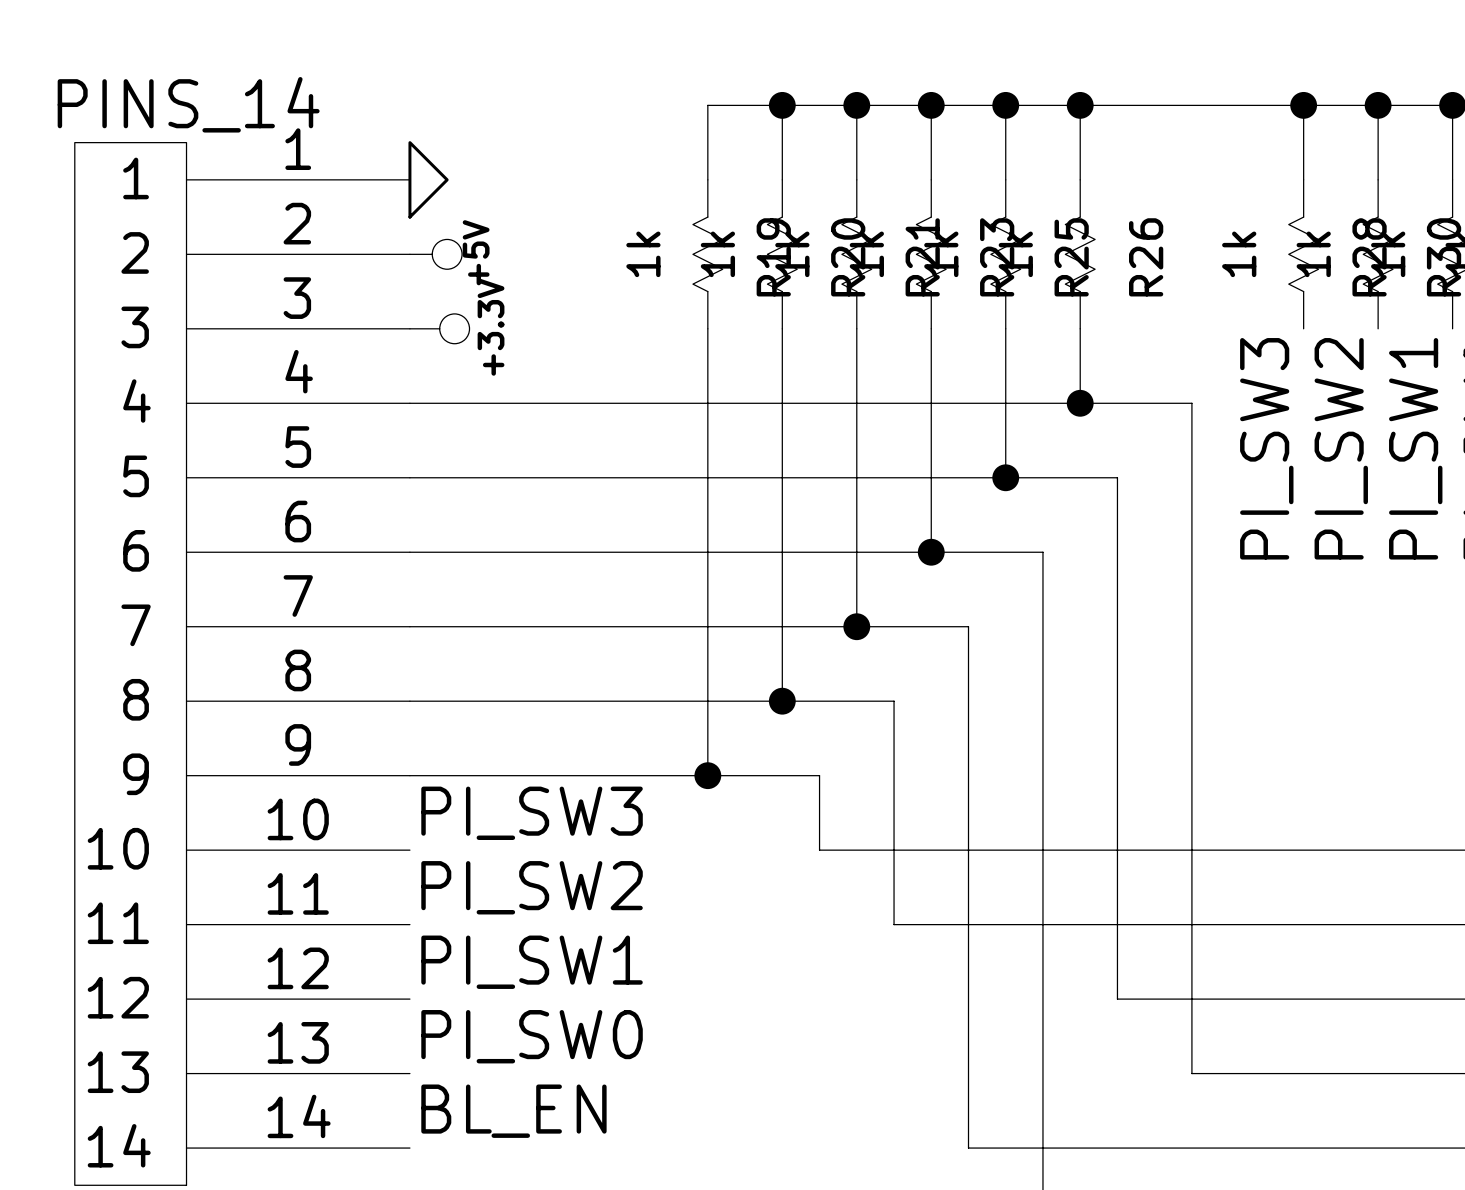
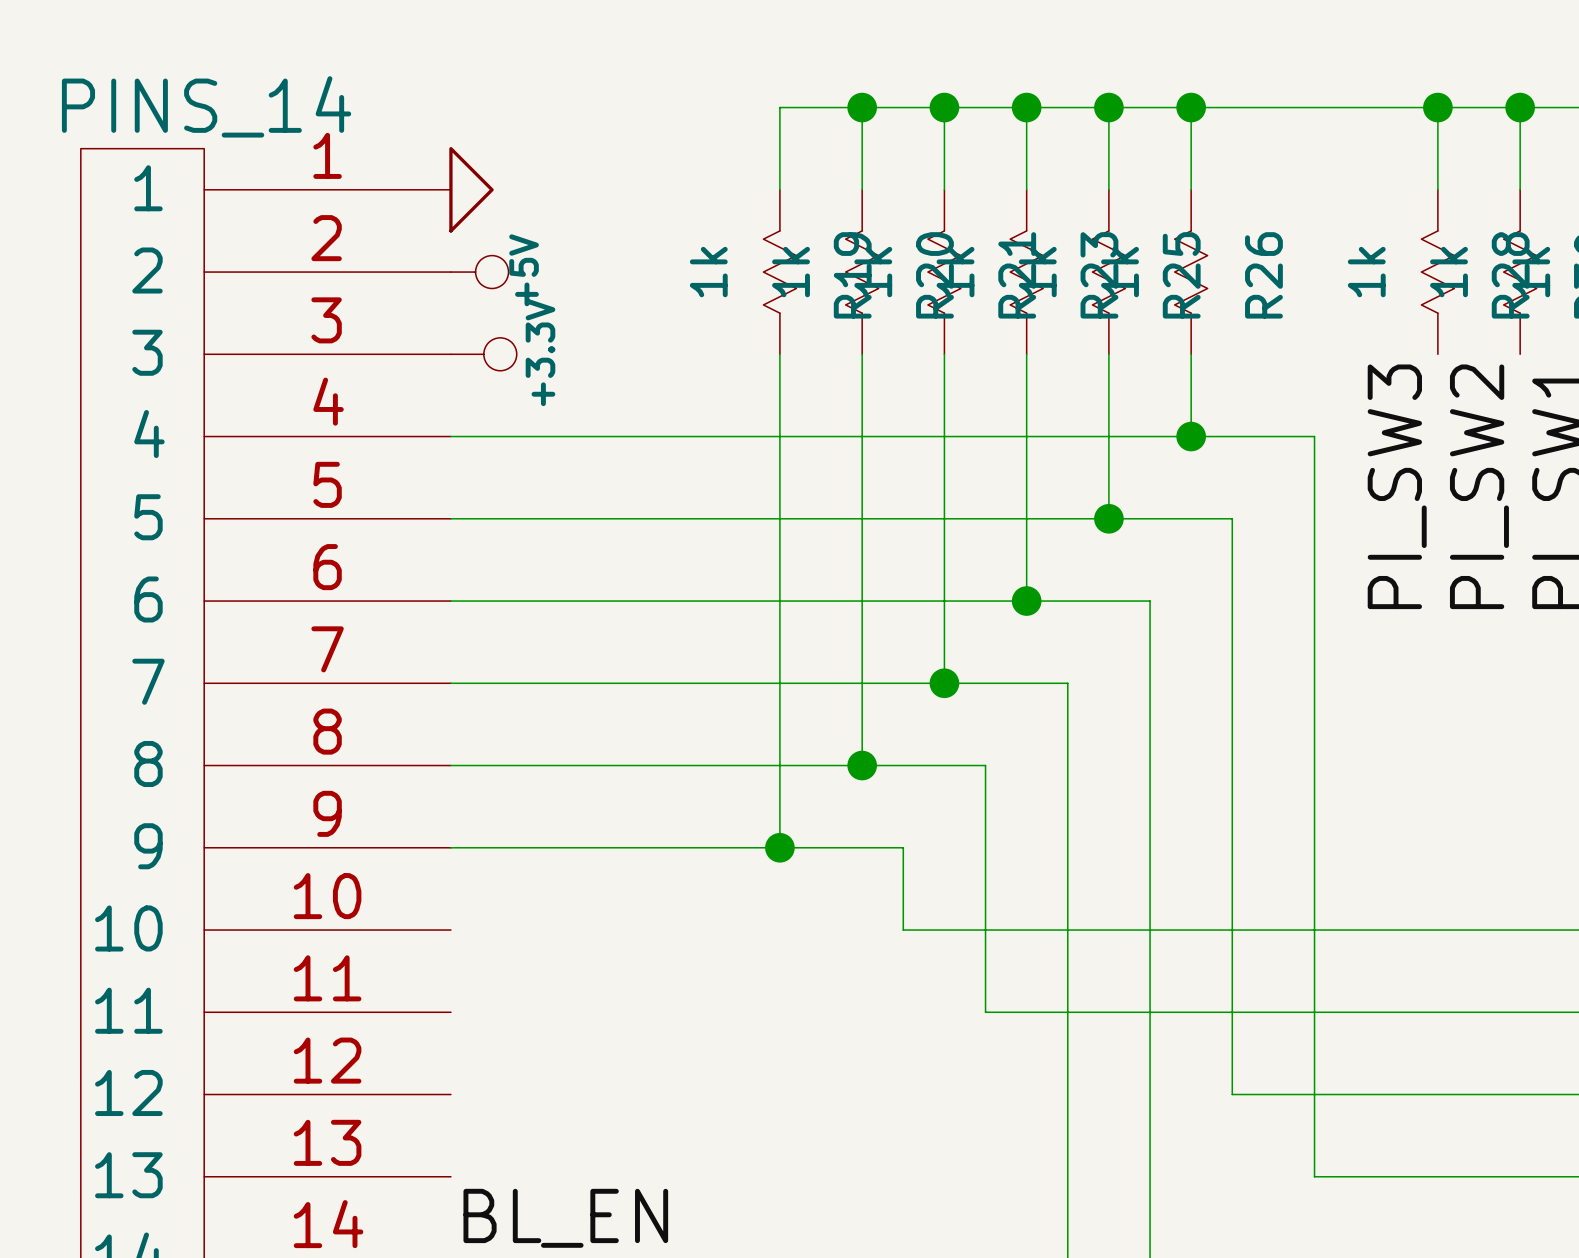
label: PI_SW3 (532, 813) -> none
label: PI_SW2 (532, 887) -> none
label: PI_SW1 (532, 962) -> none
label: PI_SW0 (532, 1036) -> none

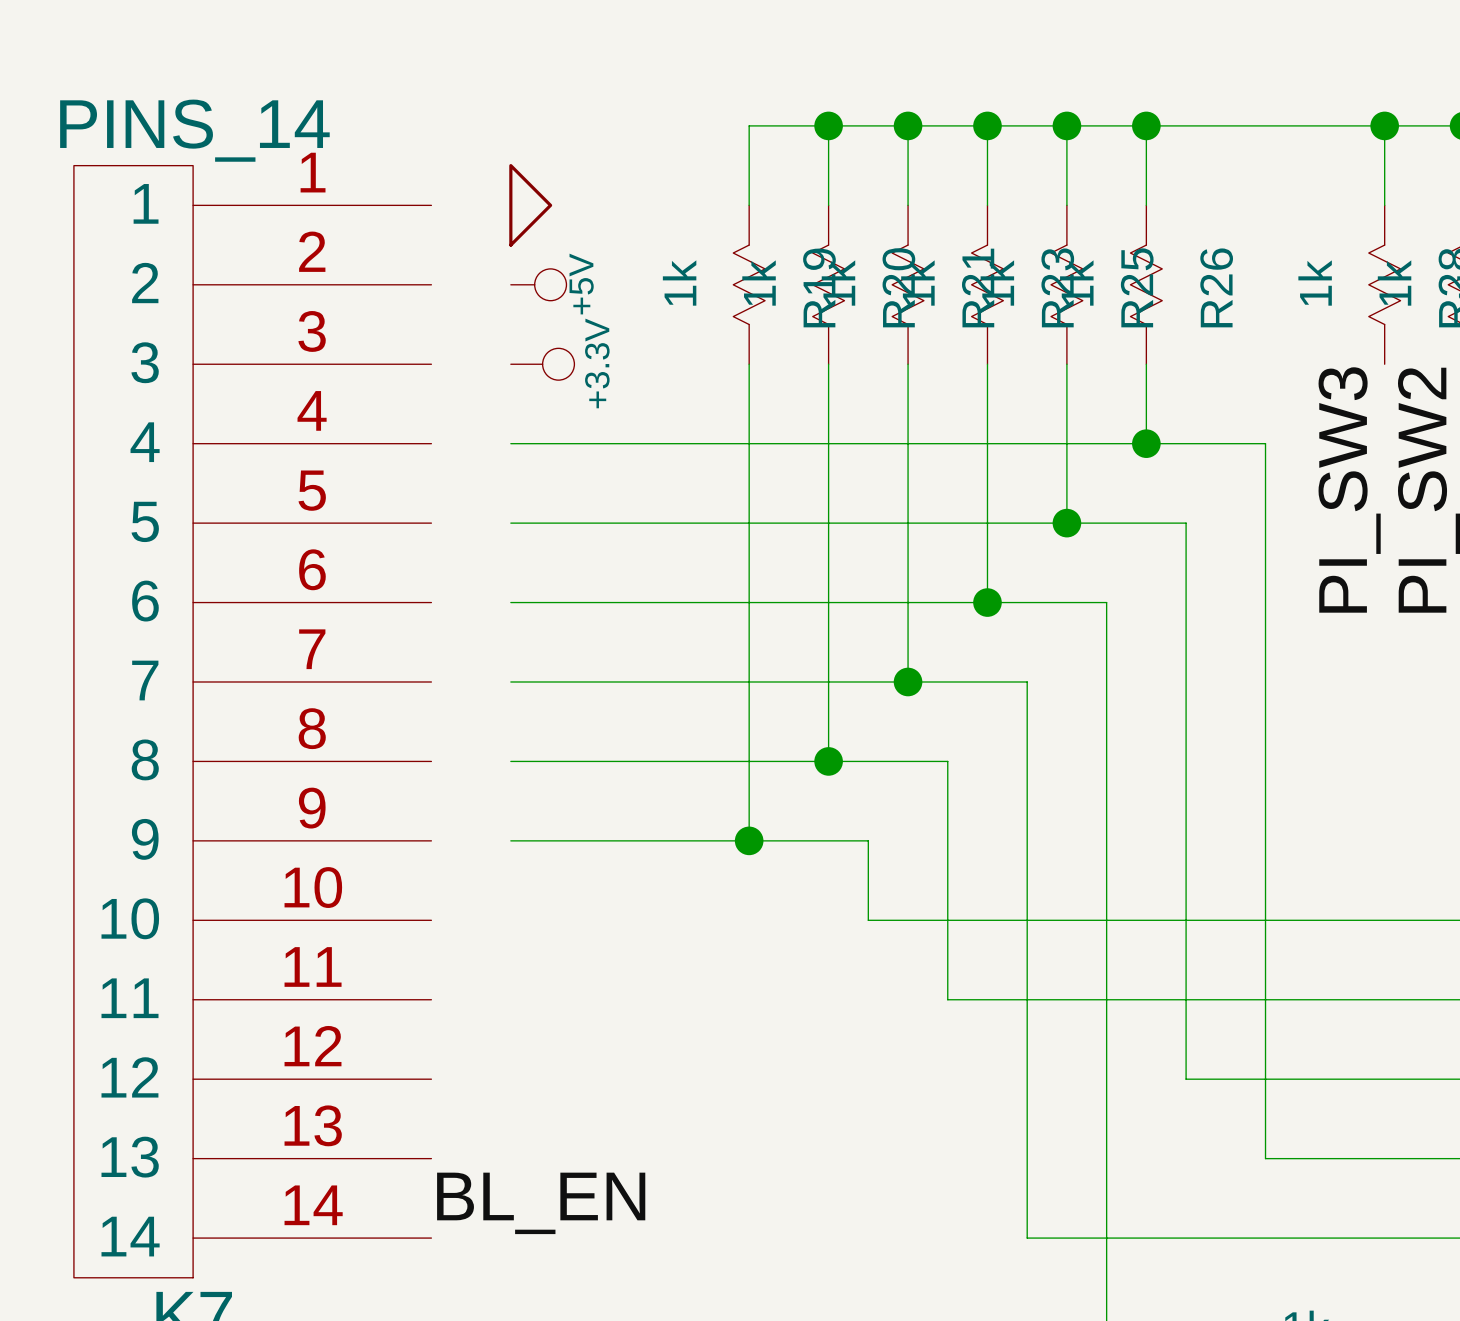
power symbol position: (471, 189) -> (530, 205)
power symbol position: +5V (479, 272) -> +5V (538, 284)
power symbol position: +3.3V (483, 354) -> +3.3V (542, 364)
wire: (450, 436) (533, 436) -> none
wire: (450, 518) (533, 518) -> none
wire: (450, 601) (533, 601) -> none
wire: (450, 683) (533, 683) -> none
wire: (450, 765) (533, 765) -> none
wire: (450, 847) (533, 847) -> none

